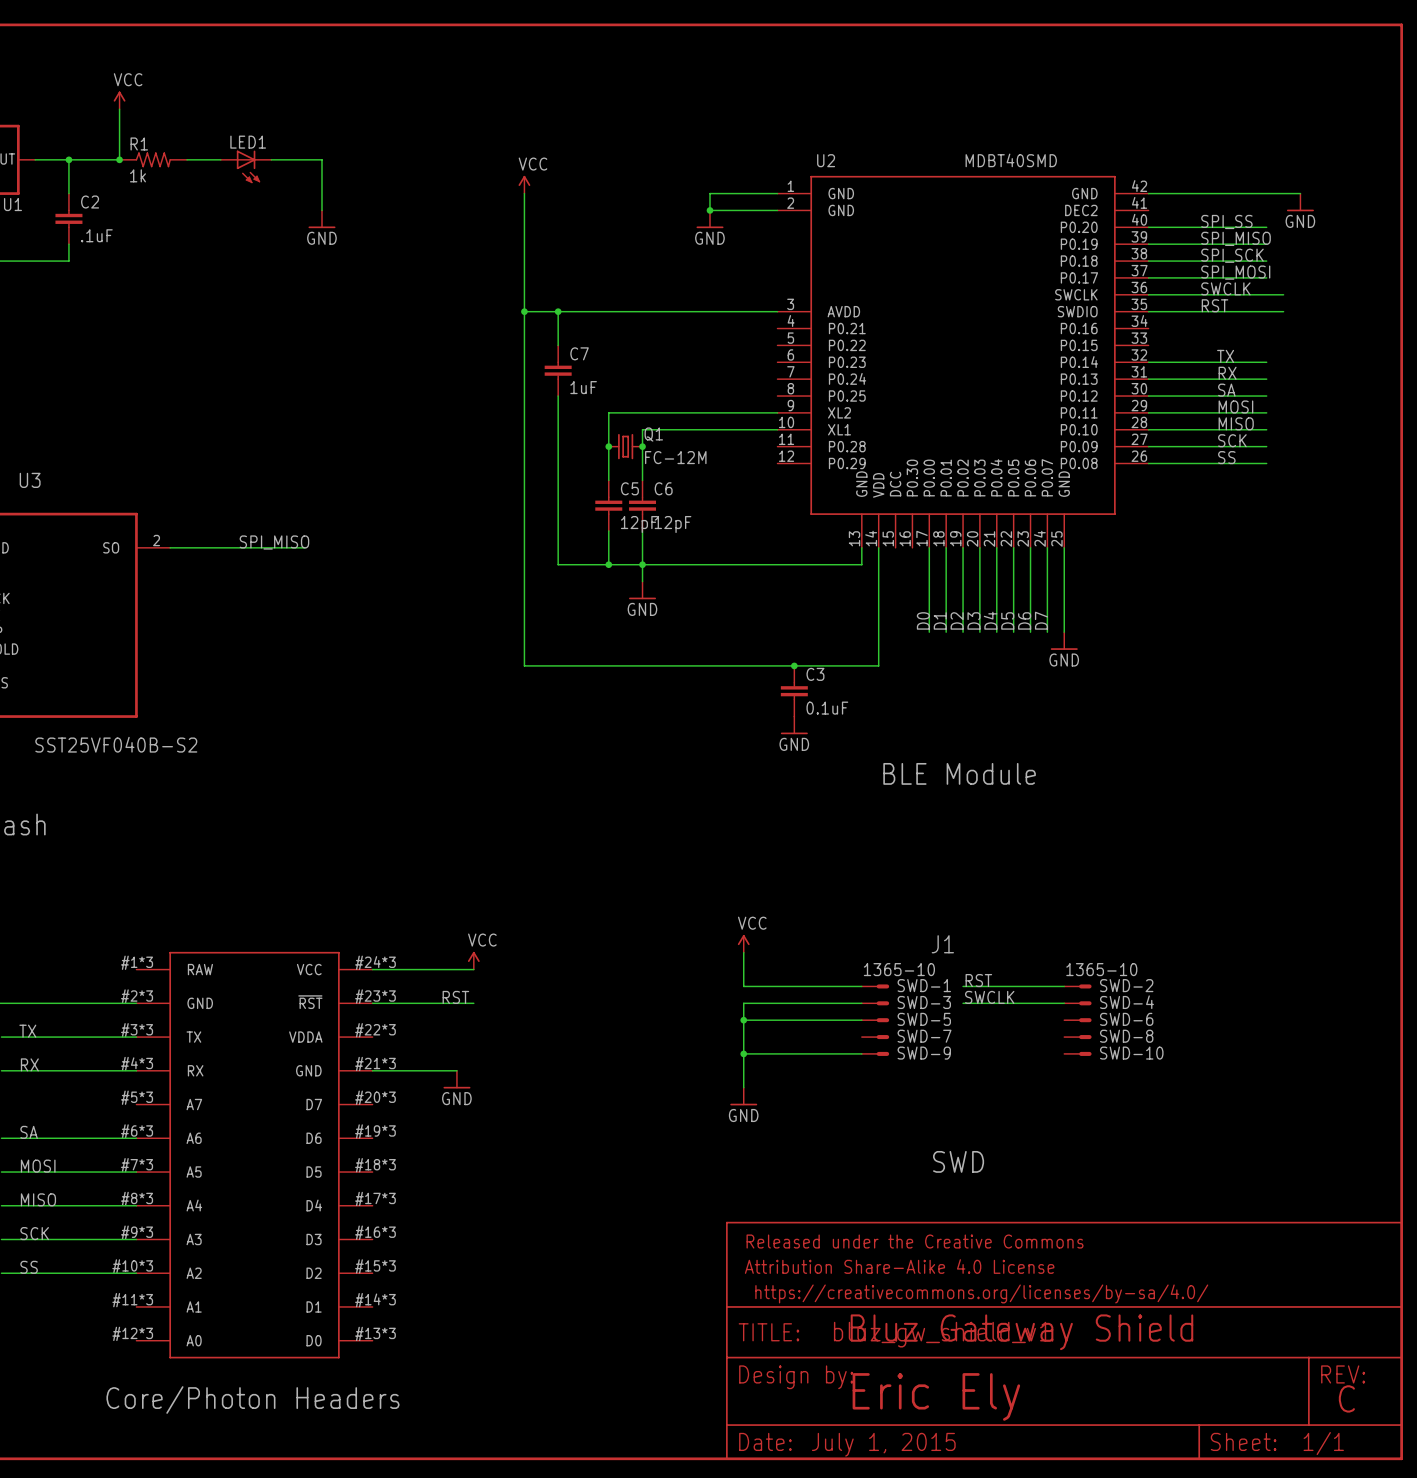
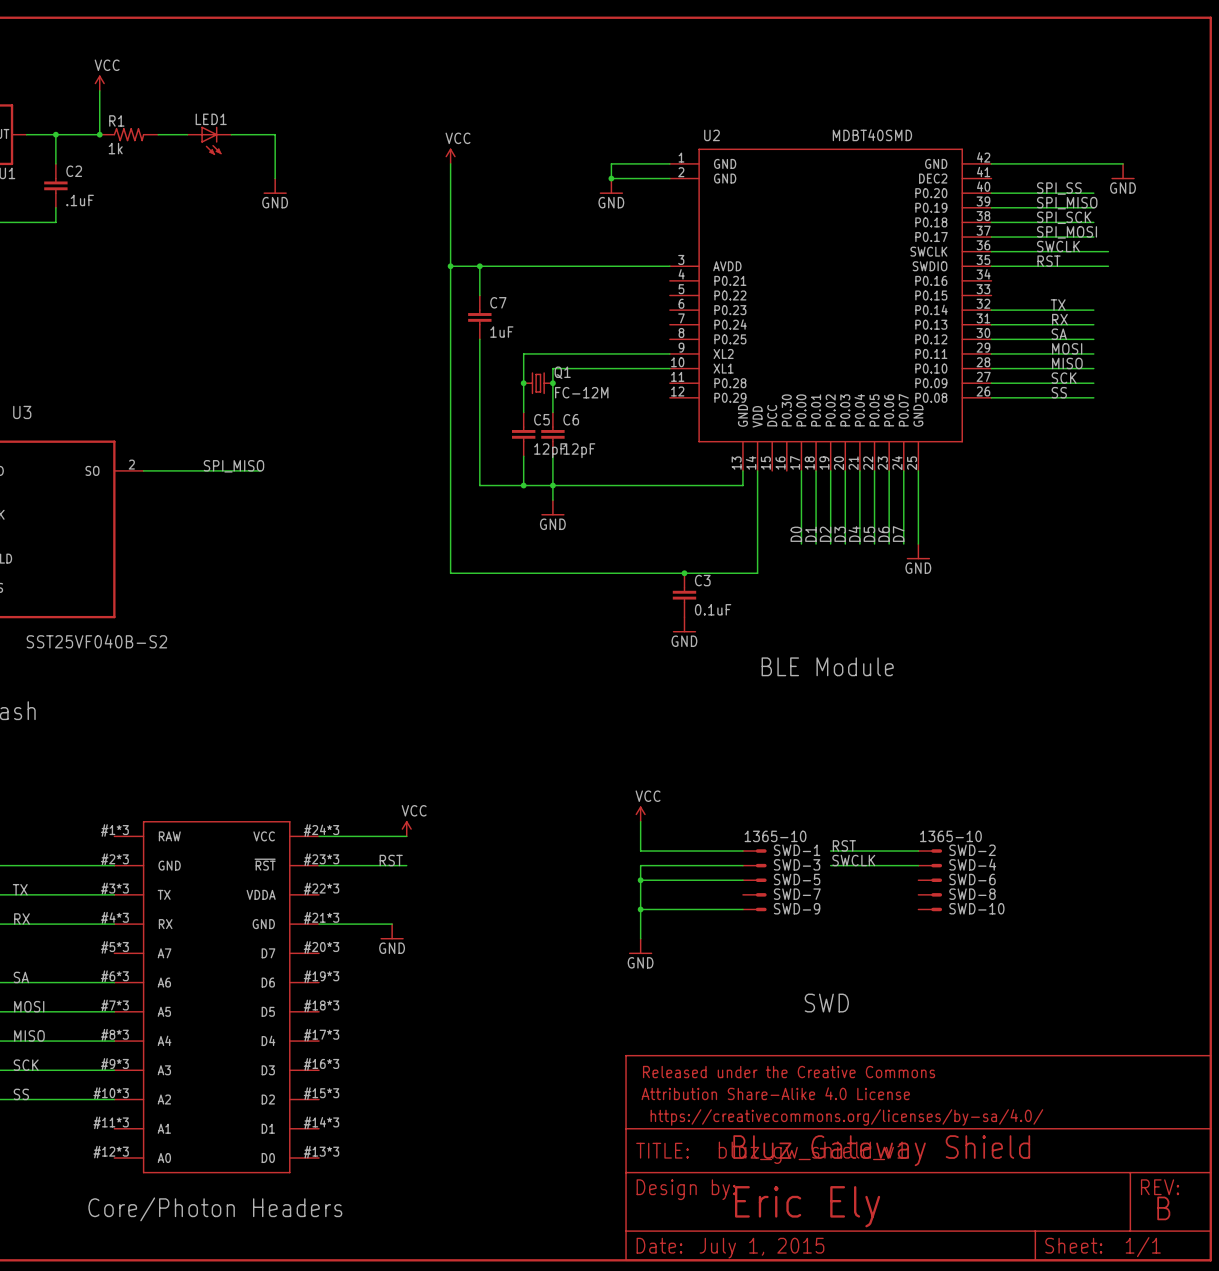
text: J1 (942, 944) -> none
text: C (1346, 1398) -> B (1163, 1208)

